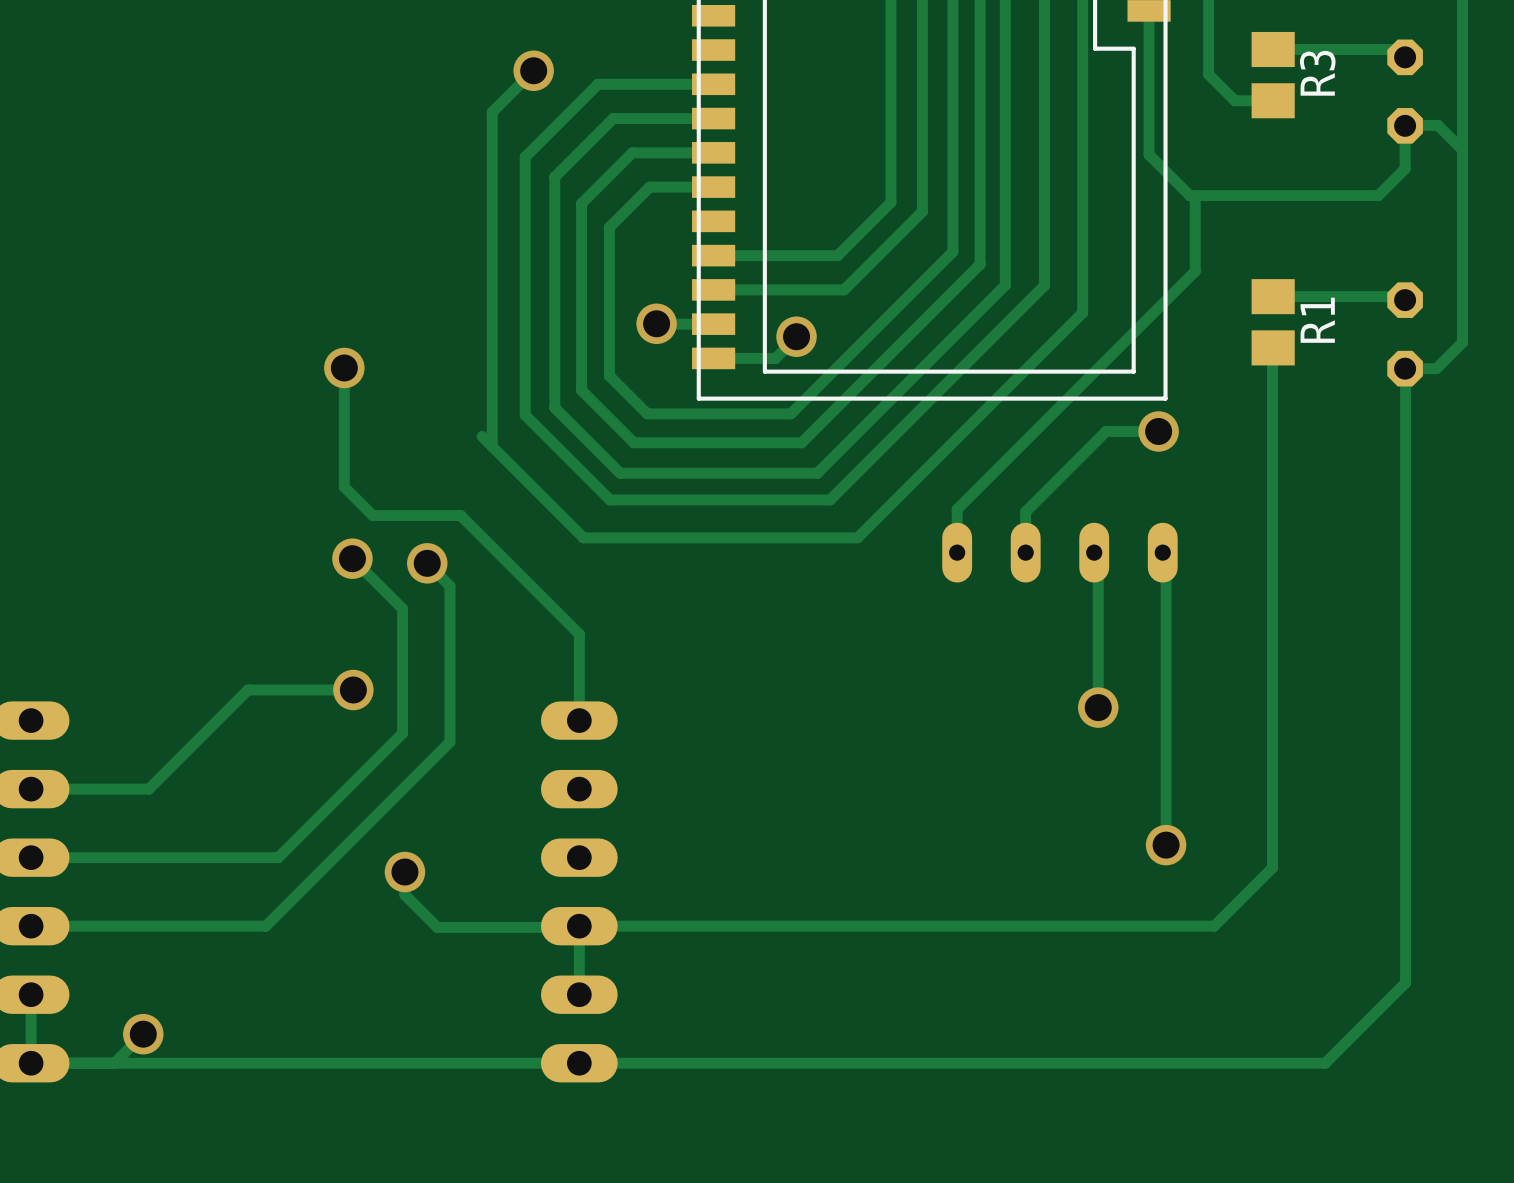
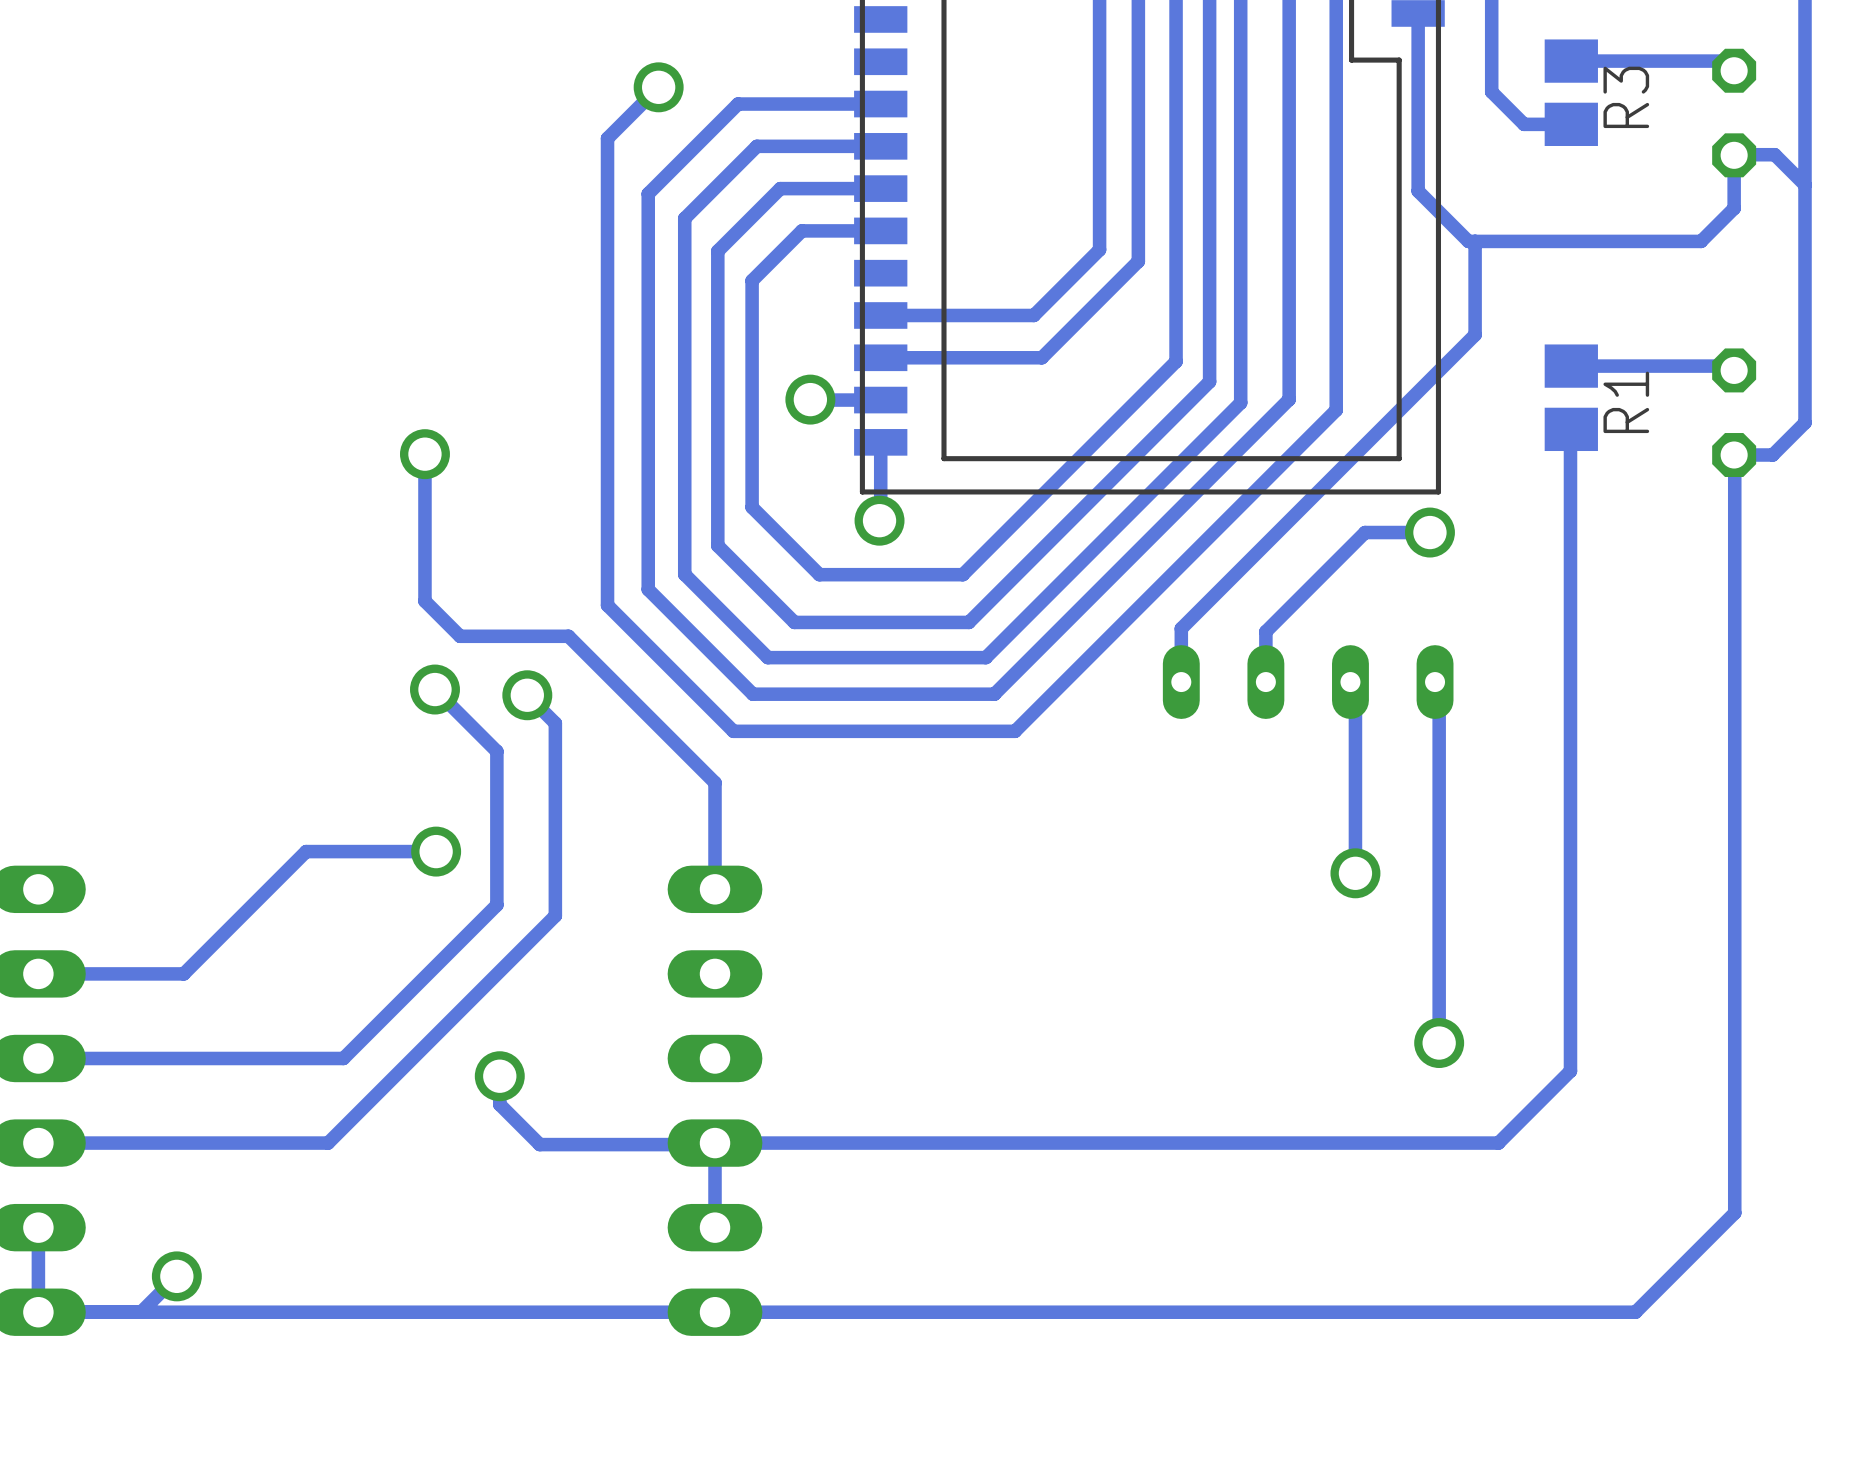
track: (952, 251) (790, 413) (647, 413) (609, 375) -> (1176, 310) (1176, 361) (962, 574) (819, 574) (752, 507) (752, 463)
track: (980, 264) (801, 442) (633, 442) (581, 390) -> (1209, 326) (1209, 381) (968, 622) (794, 622) (717, 545) (717, 481)
track: (1005, 285) (817, 473) (620, 473) (554, 407) -> (1240, 352) (1240, 402) (985, 657) (767, 657) (684, 574) (684, 503)
track: (1044, 285) (830, 499) (610, 499) (525, 415) -> (1289, 352) (1289, 399) (994, 694) (752, 694) (648, 589) (648, 512)
track: (1082, 312) (857, 537) (583, 537) (482, 436) -> (1336, 386) (1336, 410) (1015, 731) (733, 731) (607, 605) (607, 551)
track: (796, 336) (775, 358) (713, 358) -> (879, 520) (881, 518) (880, 442)
via position: (796, 336) -> (879, 520)

